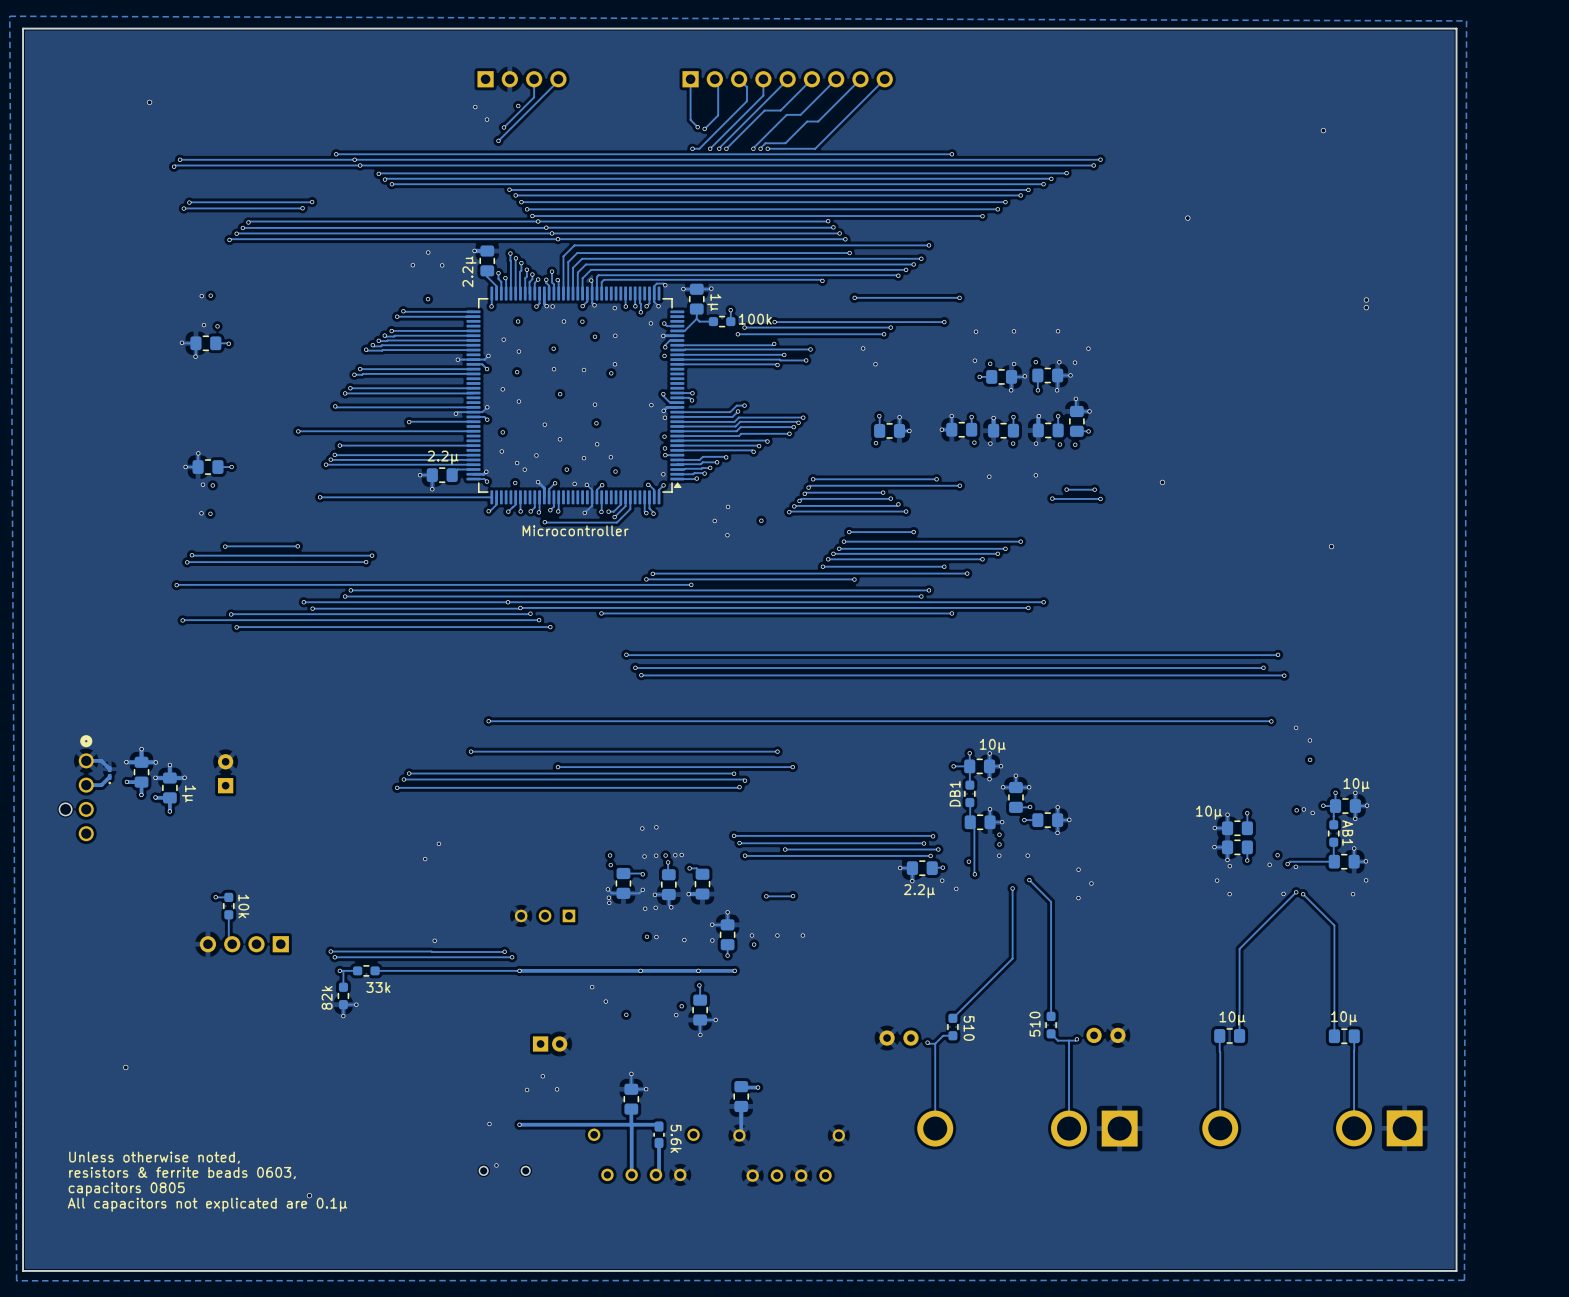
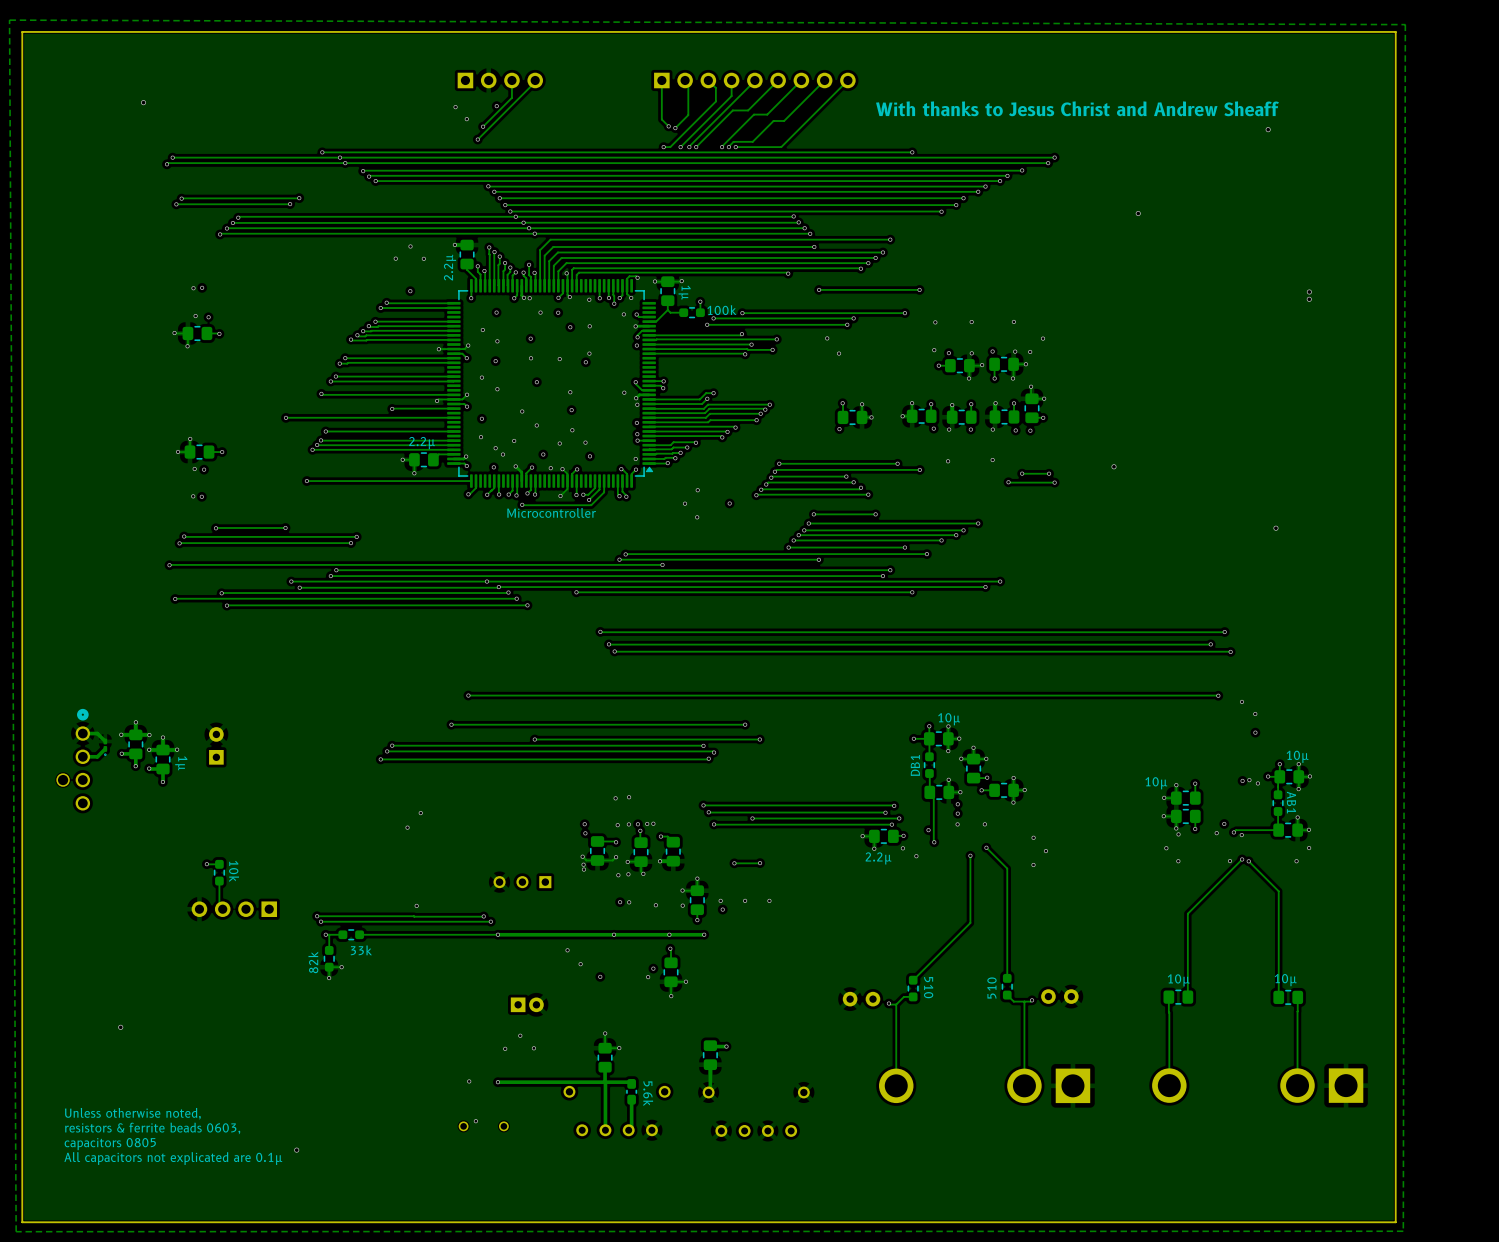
text: none -> With thanks to Jesus Christ and Andrew Sheaff (1077, 108)

